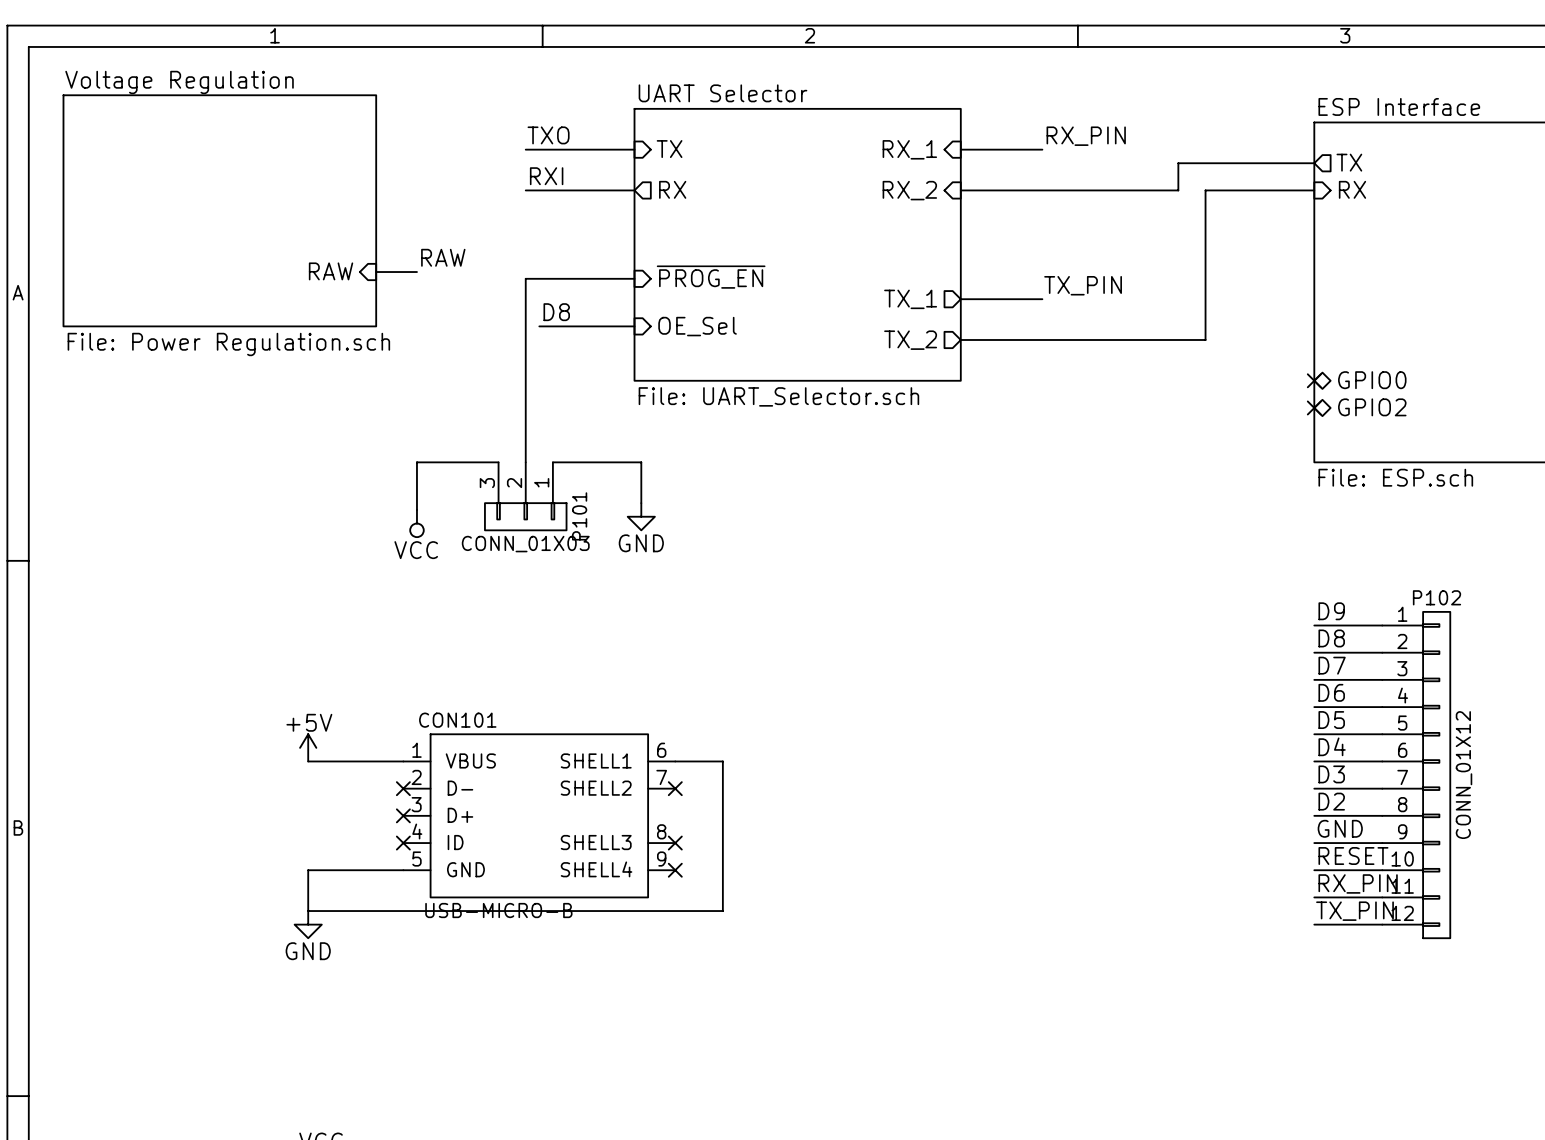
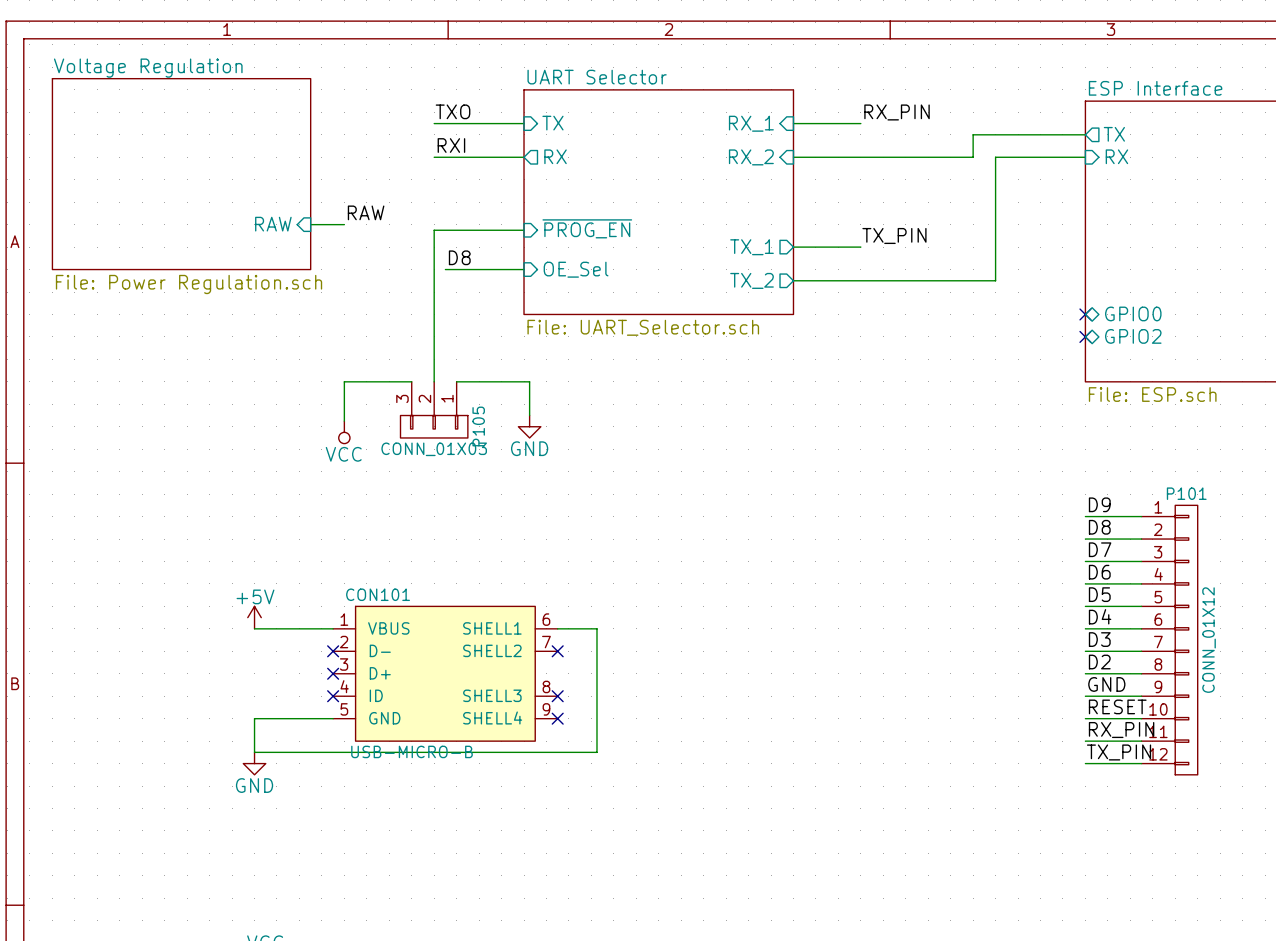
P101 name: P101 (579, 516) -> P105 (478, 426)
P102 name: P102 (1436, 597) -> P101 (1186, 493)

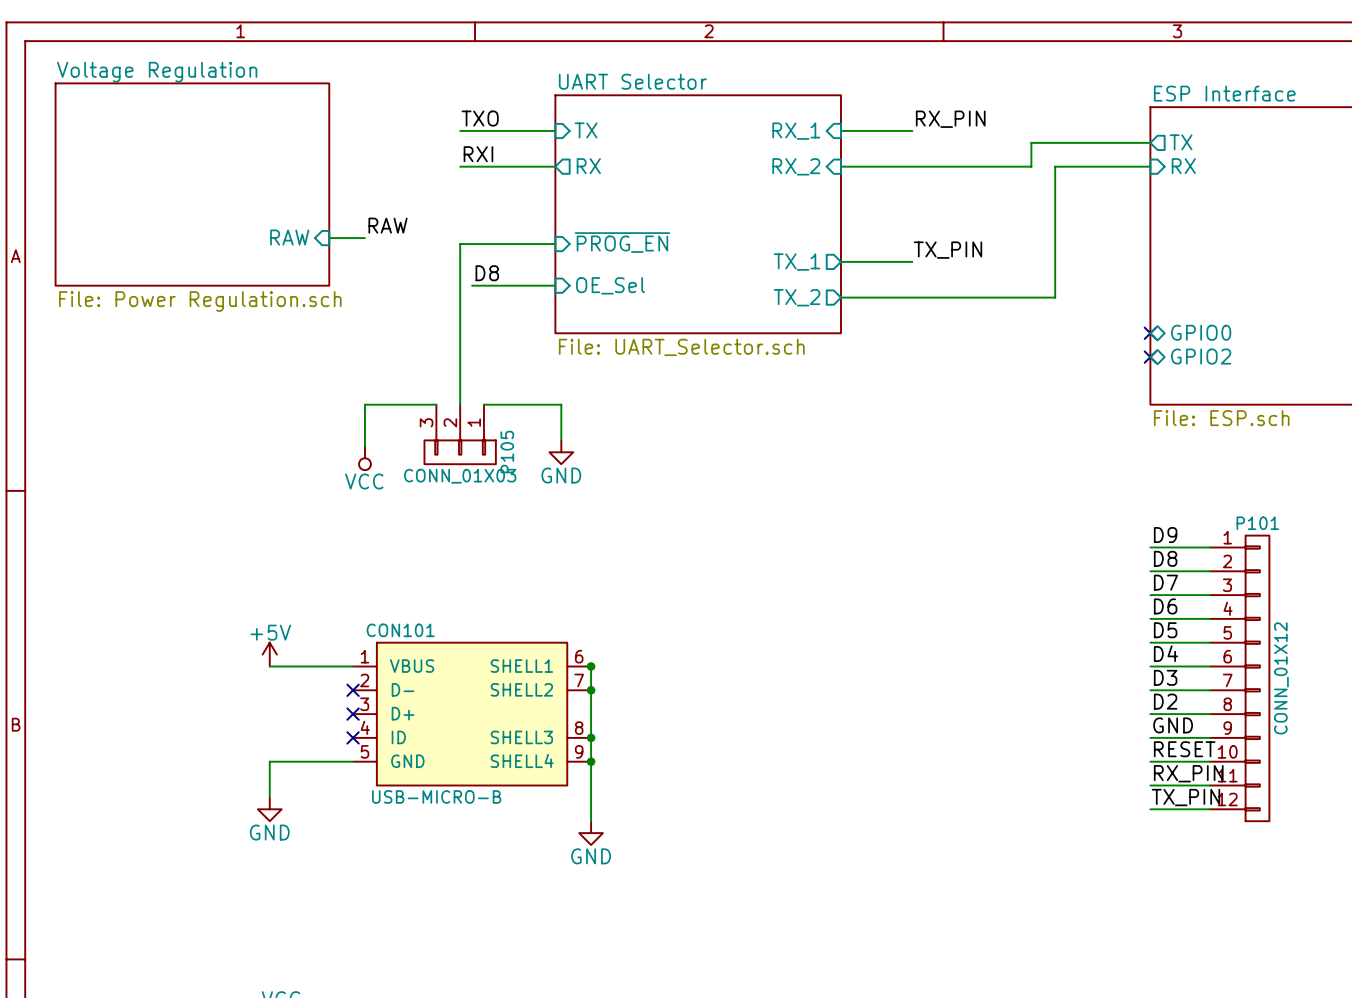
wire: (557, 628) (596, 628) (596, 752) (254, 752) -> (591, 666) (591, 821)
junction: none -> (591, 666)
no-connect mark: (557, 651) -> none
junction: none -> (591, 690)
no-connect mark: (557, 696) -> none
junction: none -> (591, 737)
no-connect mark: (557, 718) -> none
junction: none -> (591, 761)
power symbol: none -> GND (591, 833)

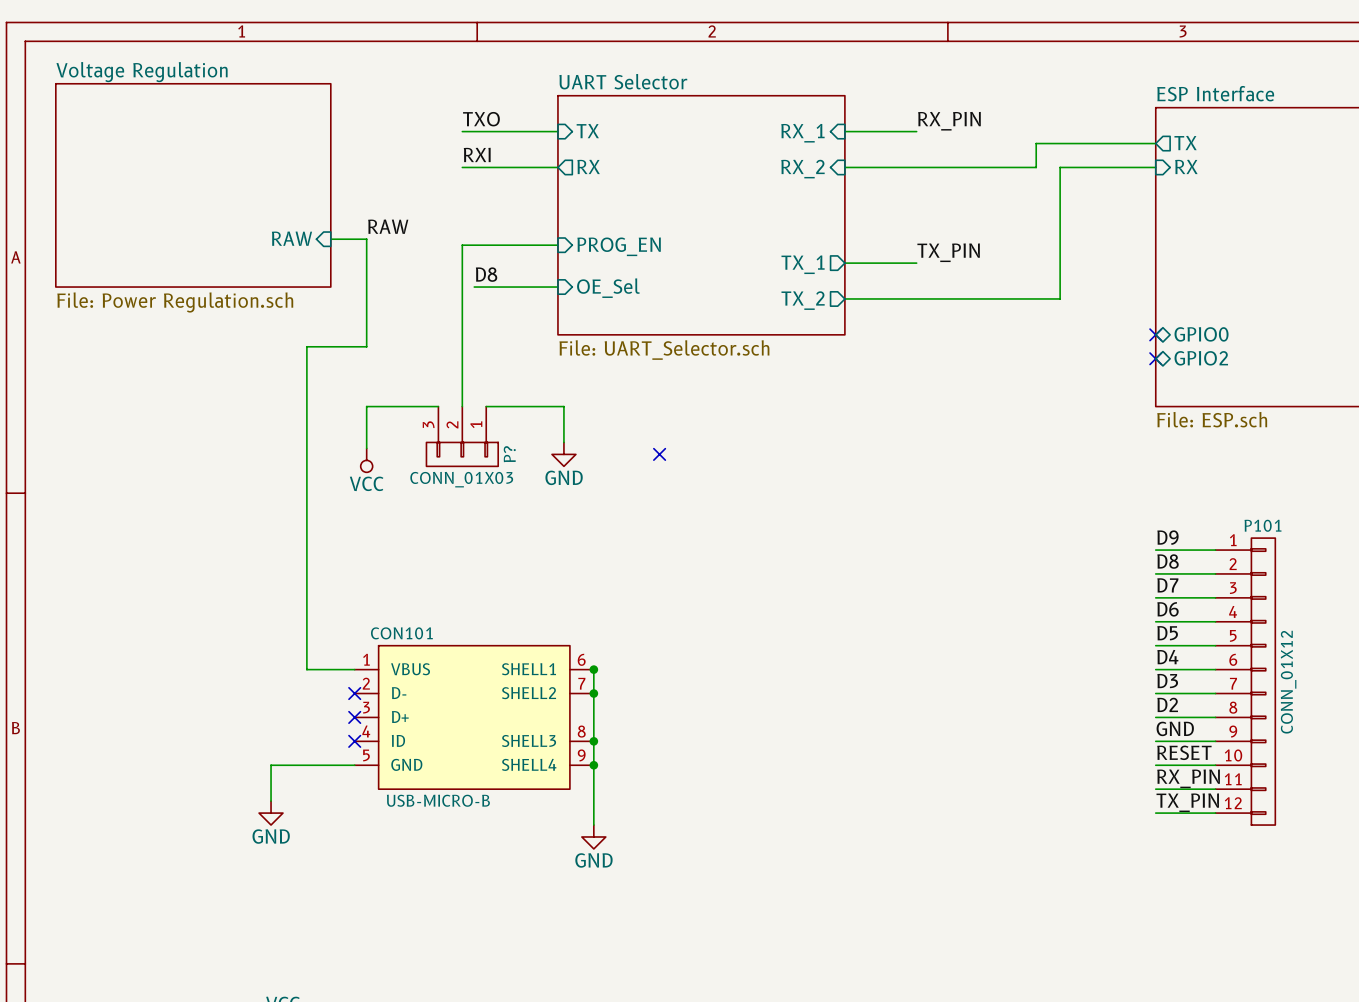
sheet pin: ~{PROG_EN} (622, 242) -> PROG_EN (619, 246)
P105 name: P105 (507, 452) -> P? (509, 454)
no-connect mark: none -> (659, 454)
power symbol: +5V (269, 654) -> none
wire: (269, 666) (305, 666) -> (366, 239) (366, 346) (306, 346) (306, 669)

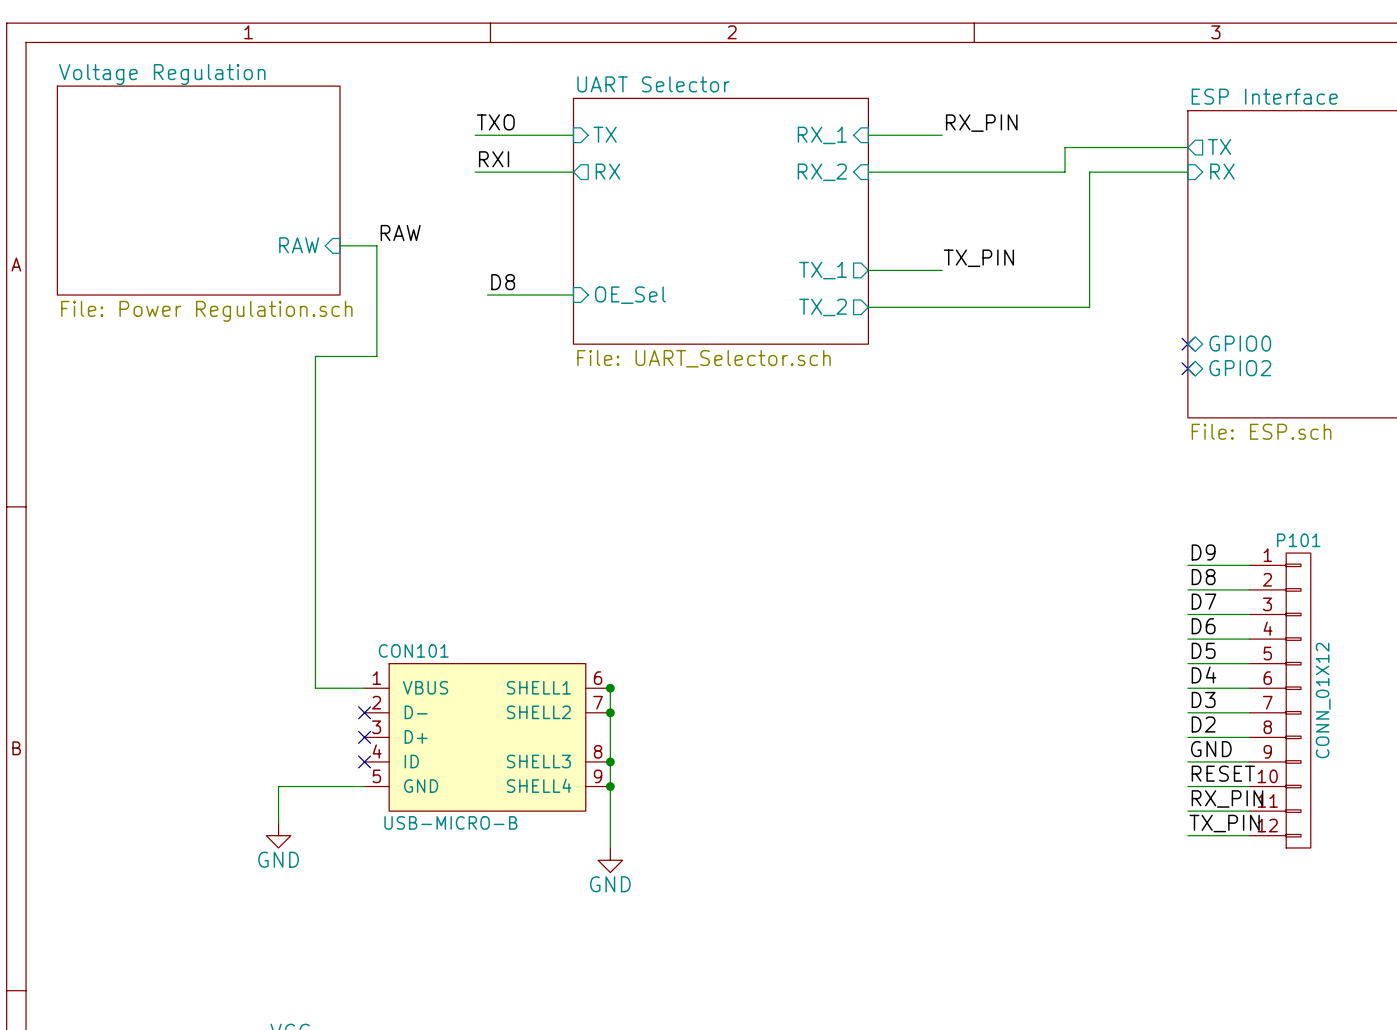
wire: (557, 245) (462, 245) (462, 406) -> none
sheet pin: PROG_EN (619, 246) -> none
wire: (438, 406) (366, 406) (366, 448) -> none
wire: (486, 406) (563, 406) (563, 442) -> none
P?: CONN_01X03 (462, 436) -> none
power symbol: GND (563, 454) -> none
no-connect mark: (659, 454) -> none
power symbol: VCC (366, 460) -> none

